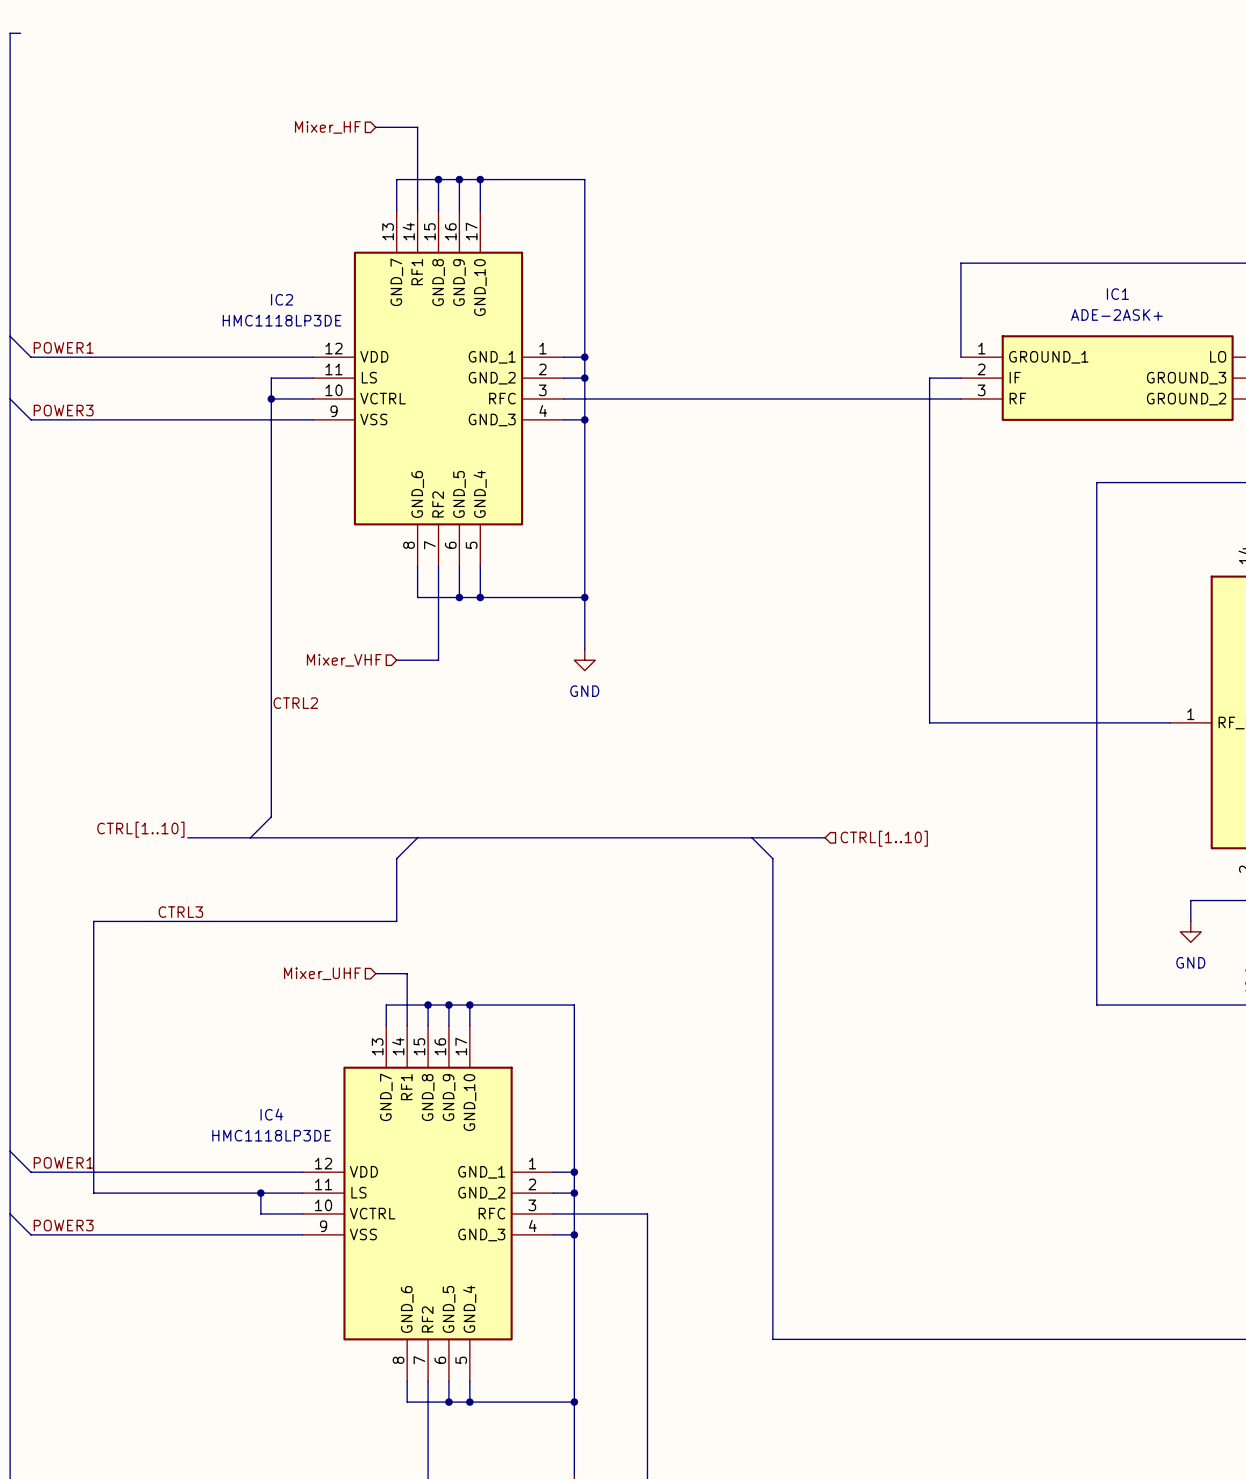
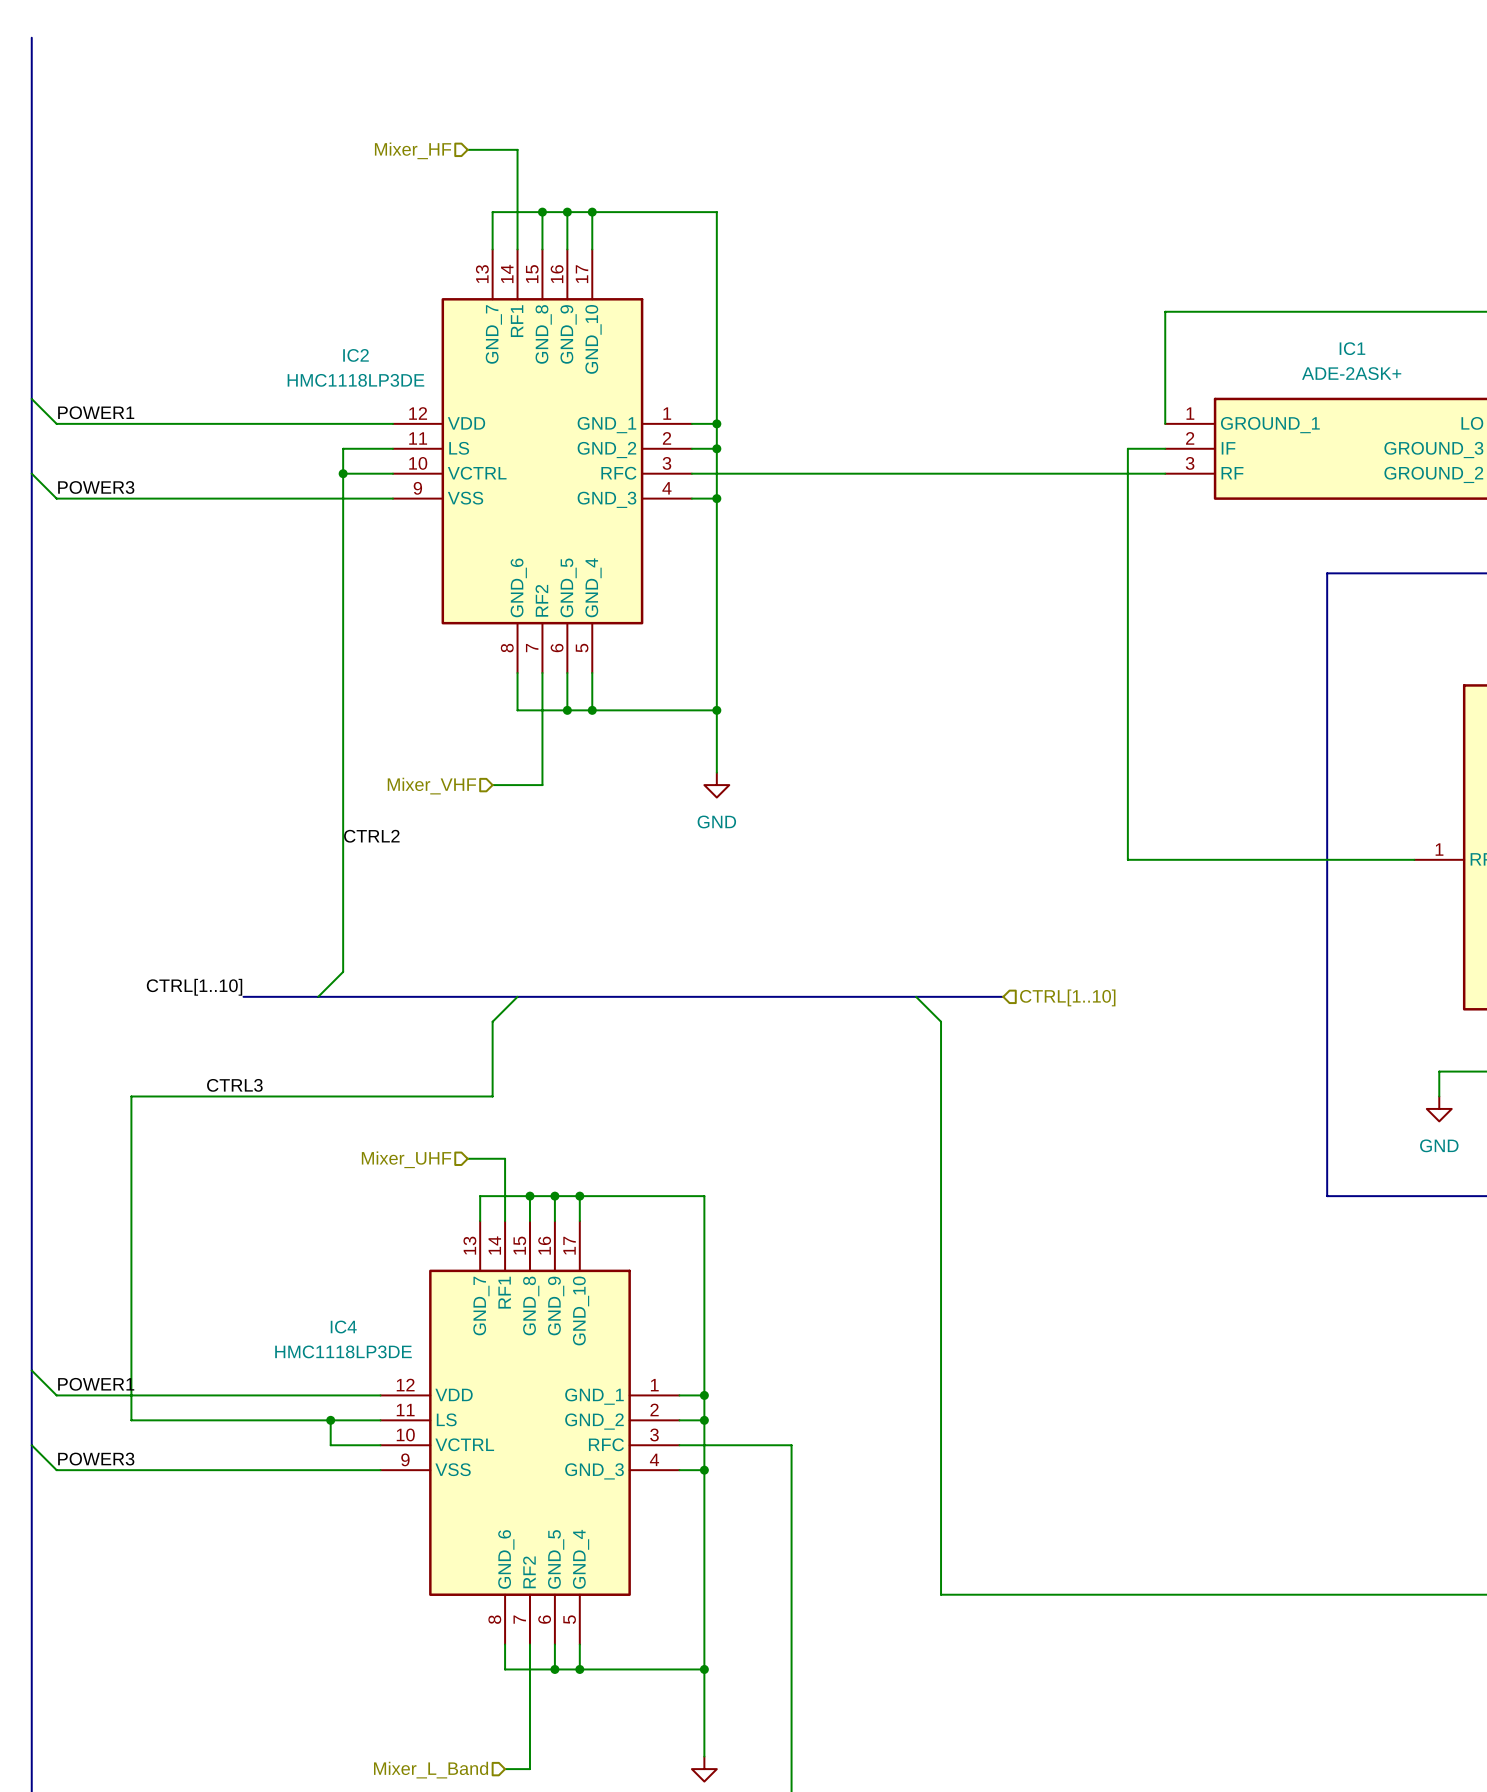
bus: (10, 33) (20, 33) -> none

